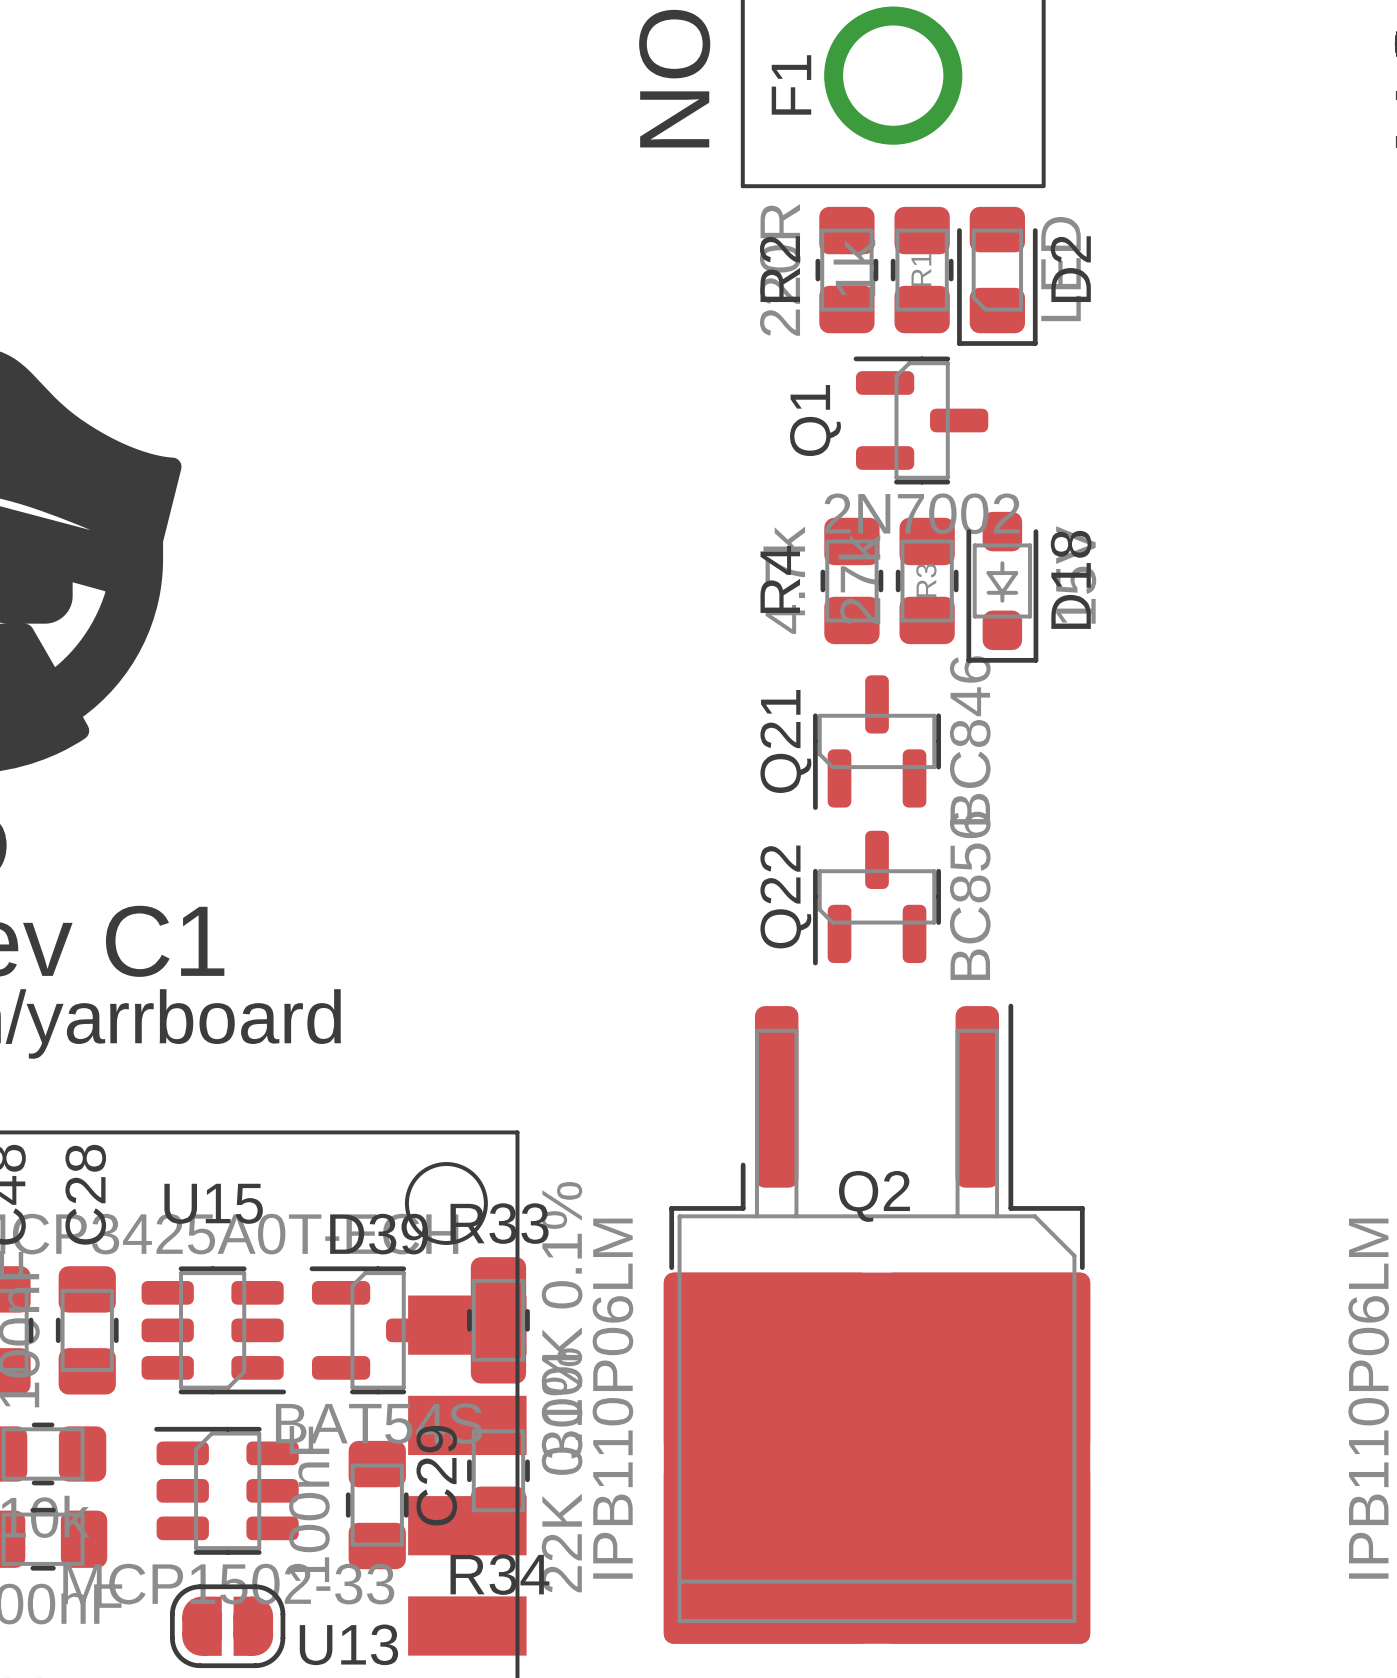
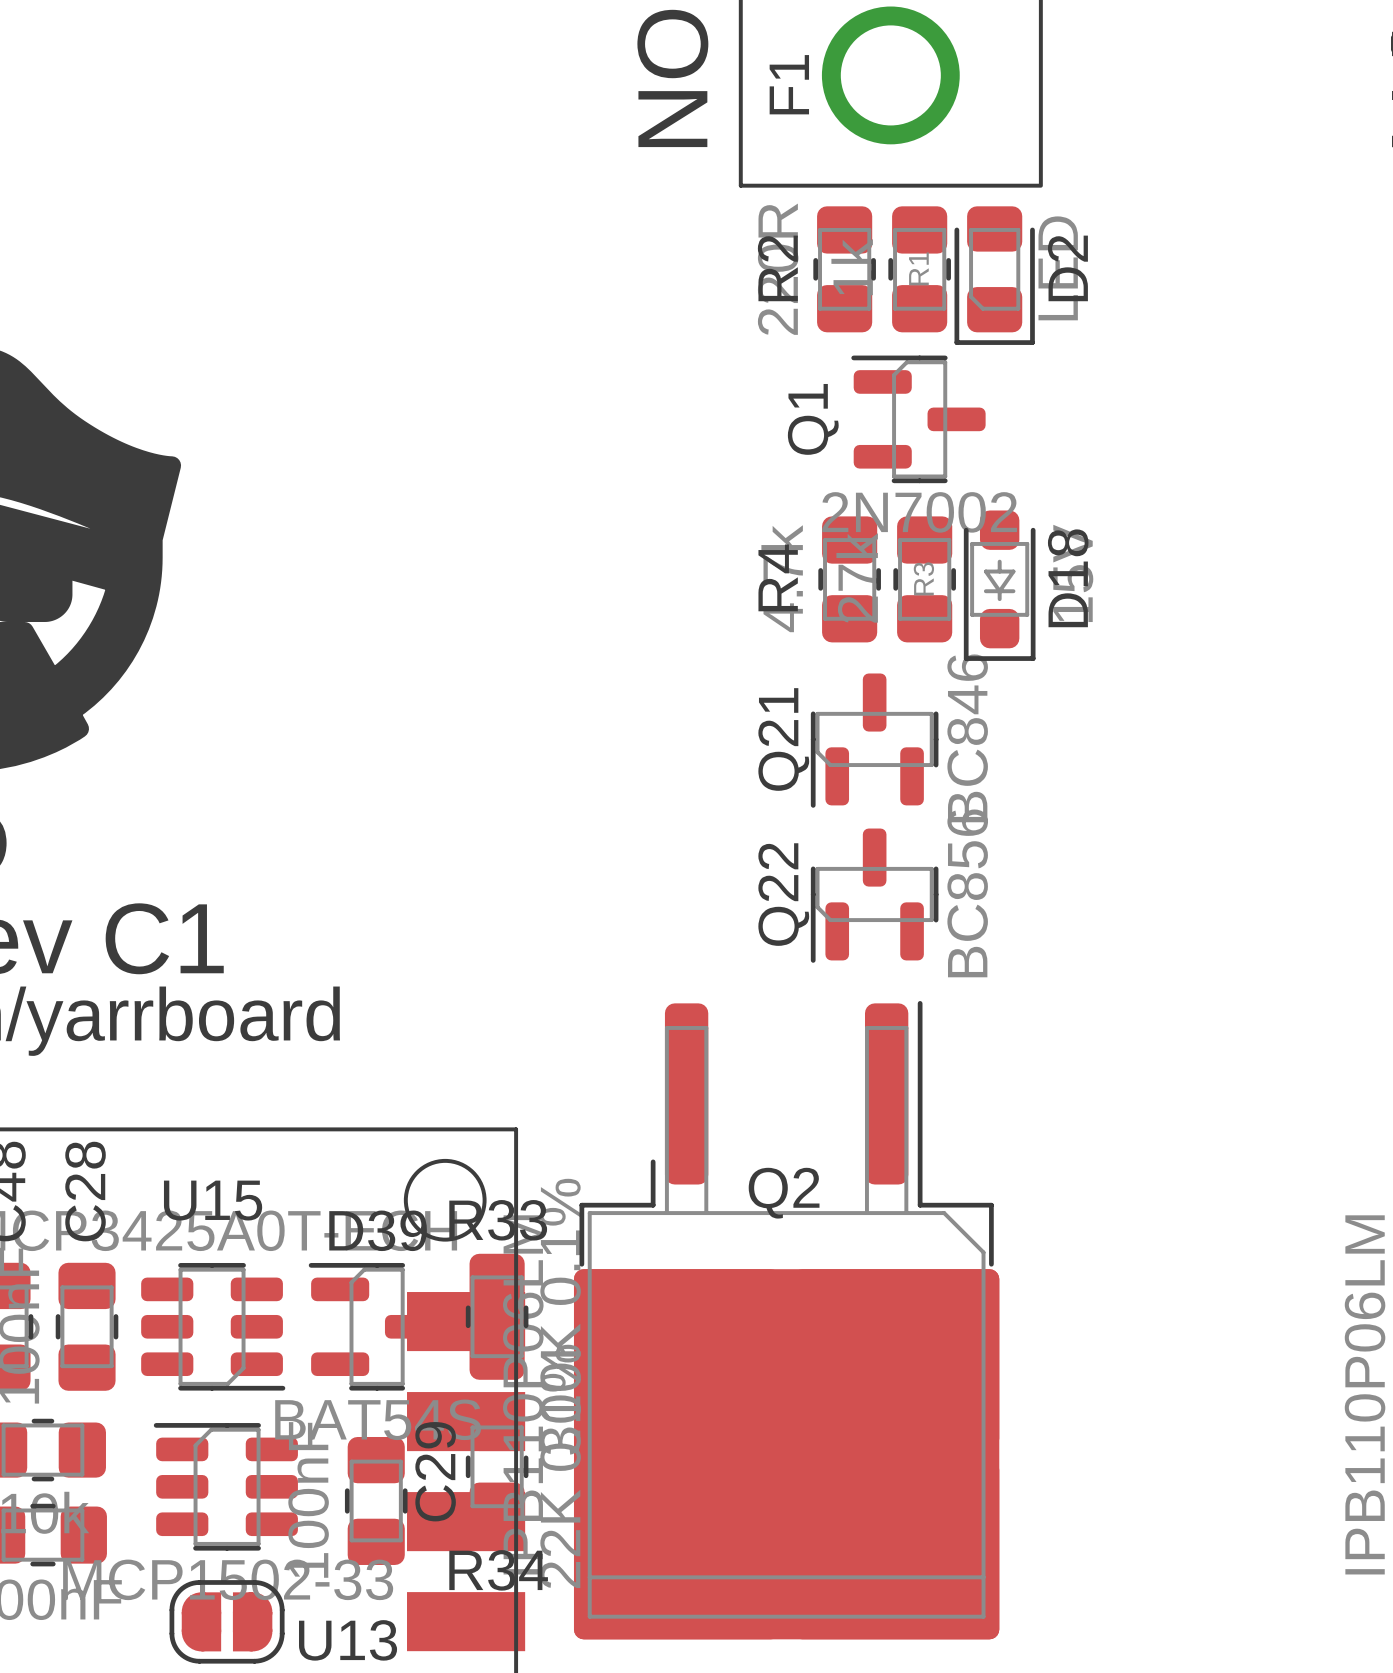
Q2 position: (877, 1323) -> (786, 1320)

